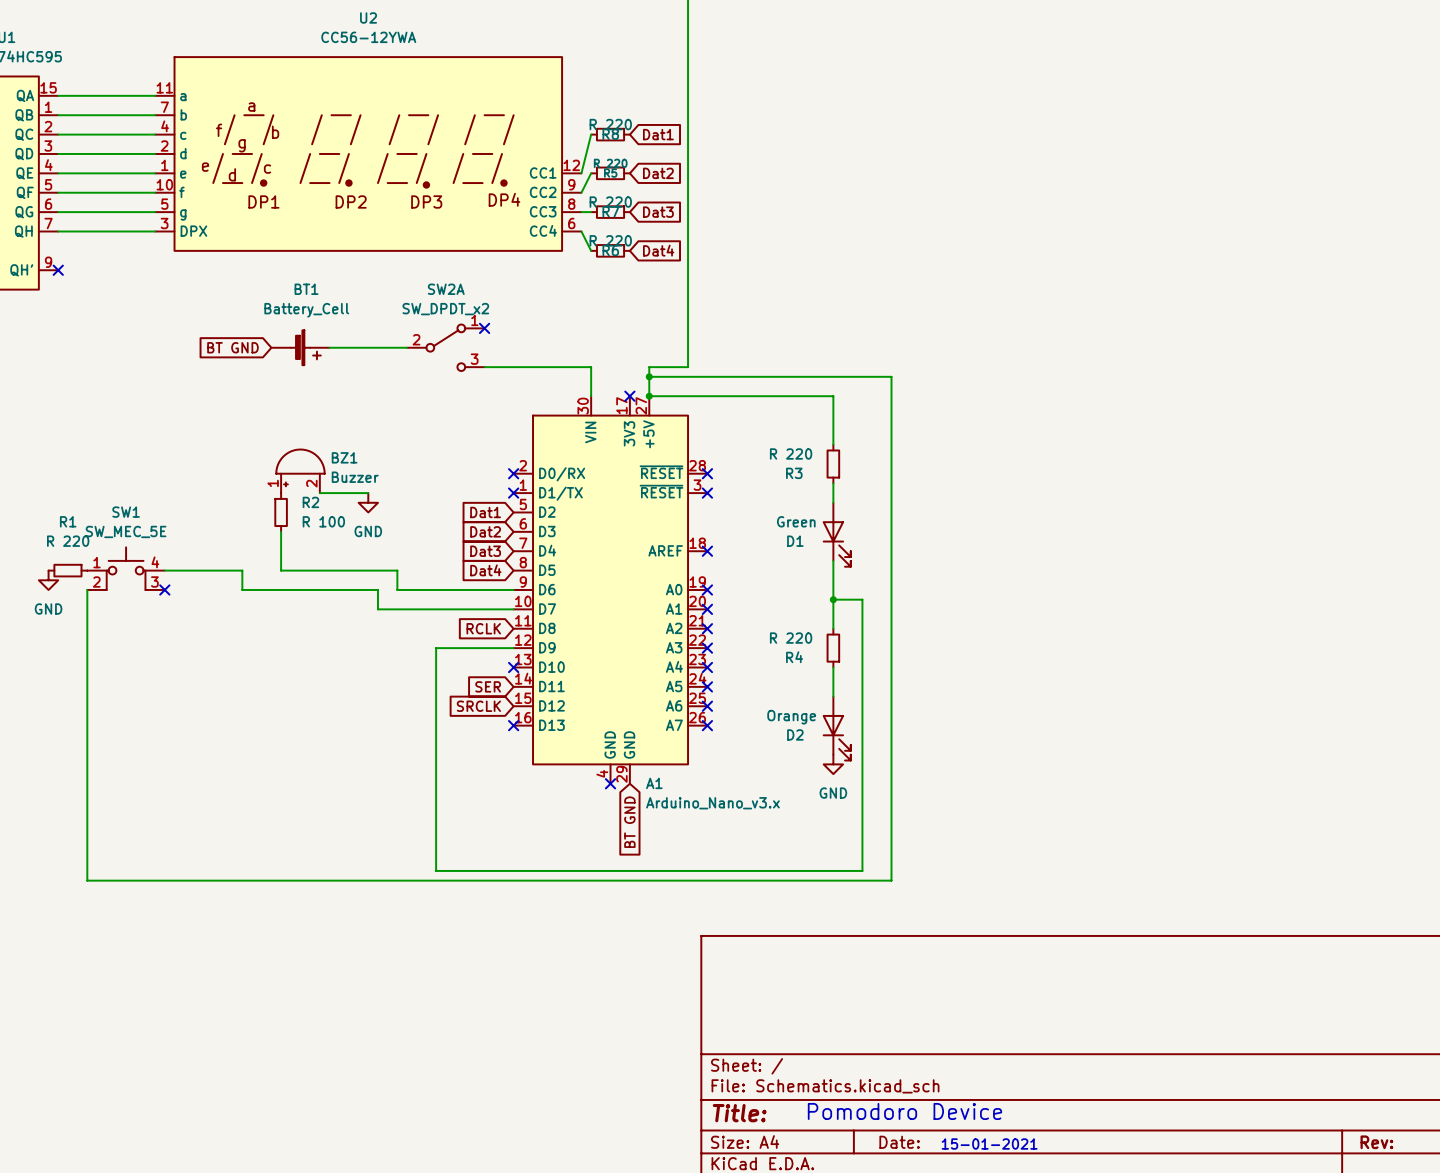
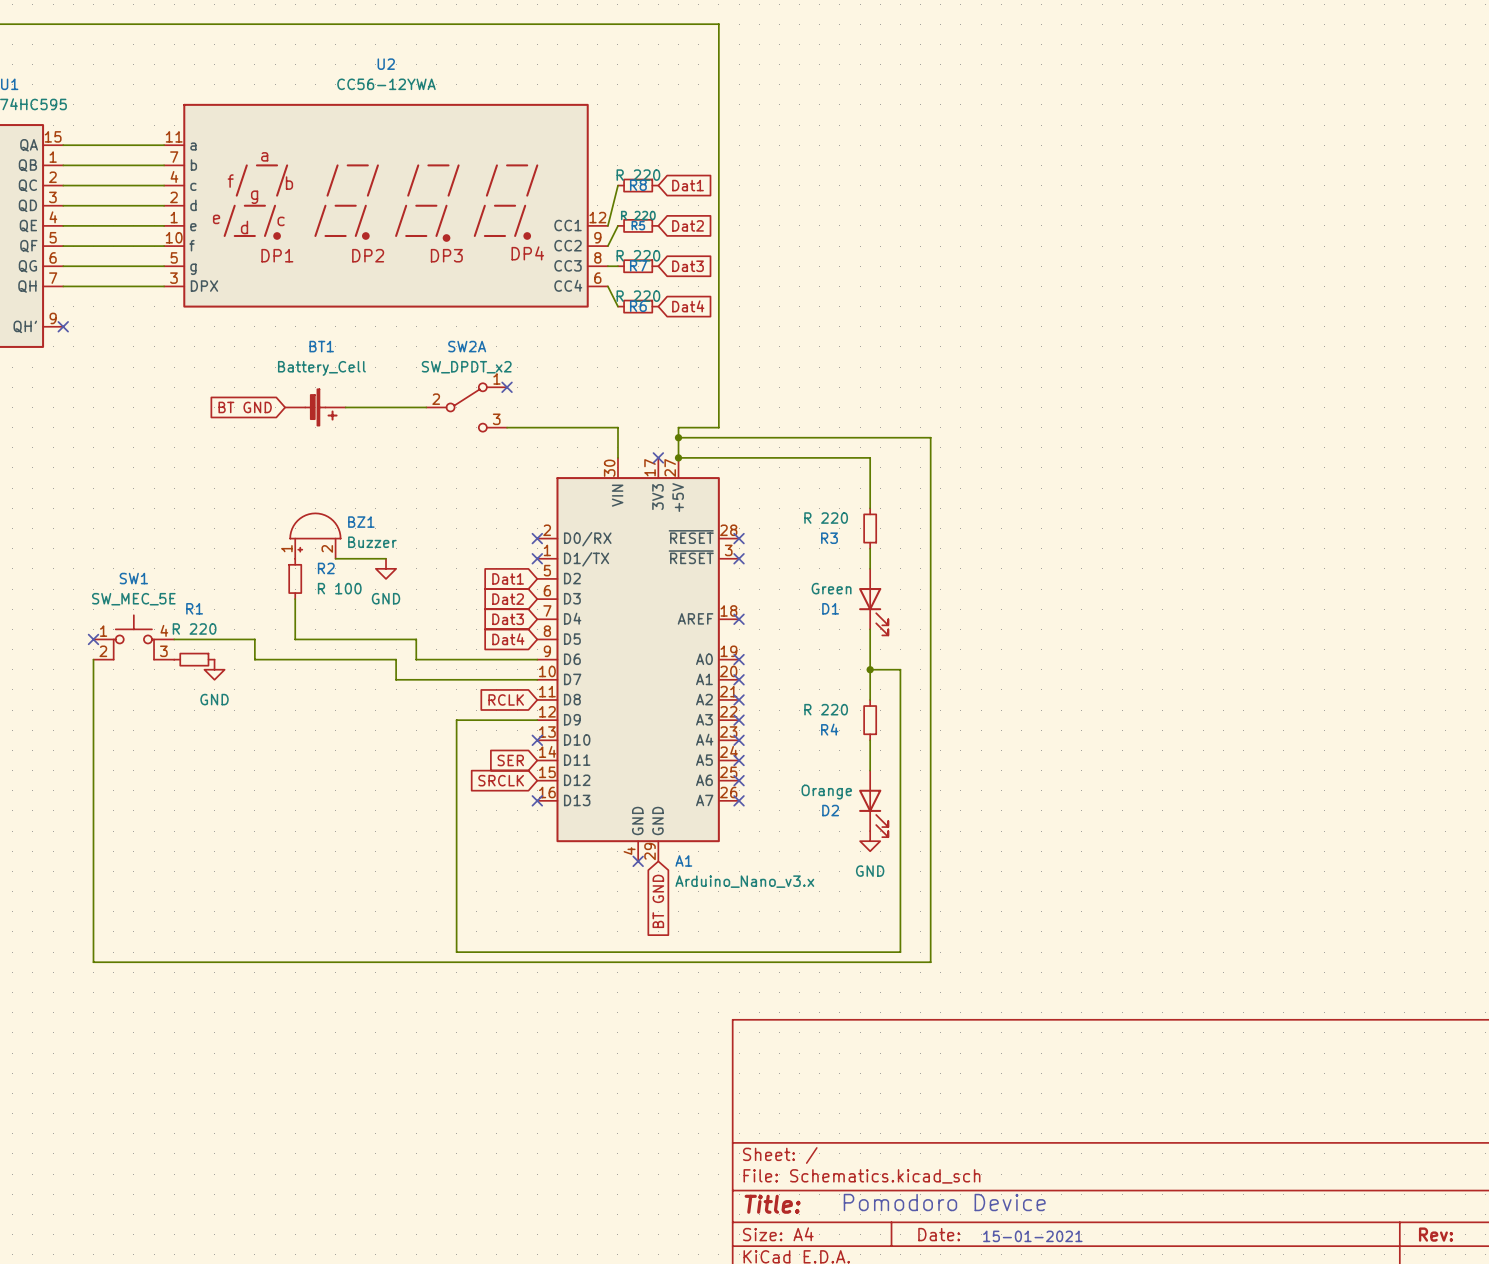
R1 position: (67, 570) -> (194, 659)
no-connect mark: none -> (93, 639)
power symbol position: GND (48, 580) -> GND (214, 669)
no-connect mark: (164, 589) -> none

